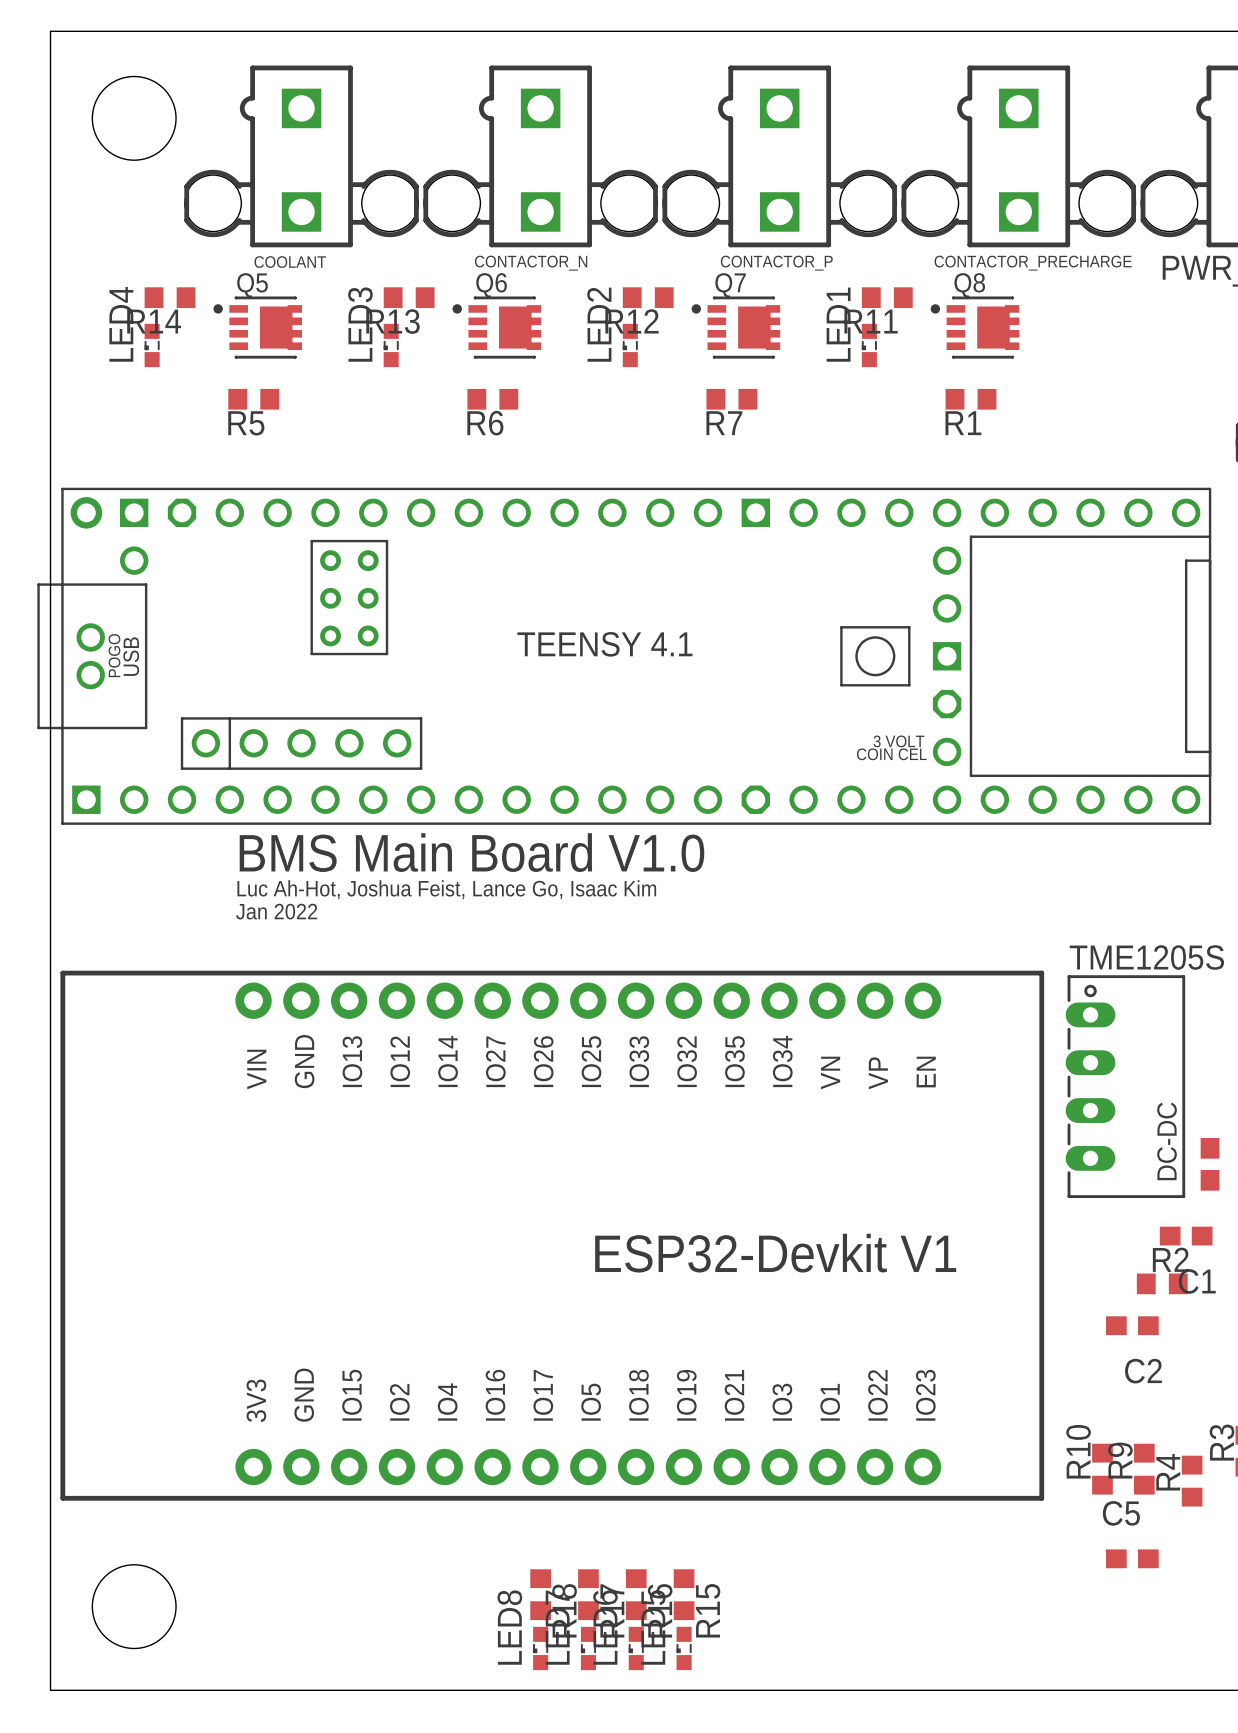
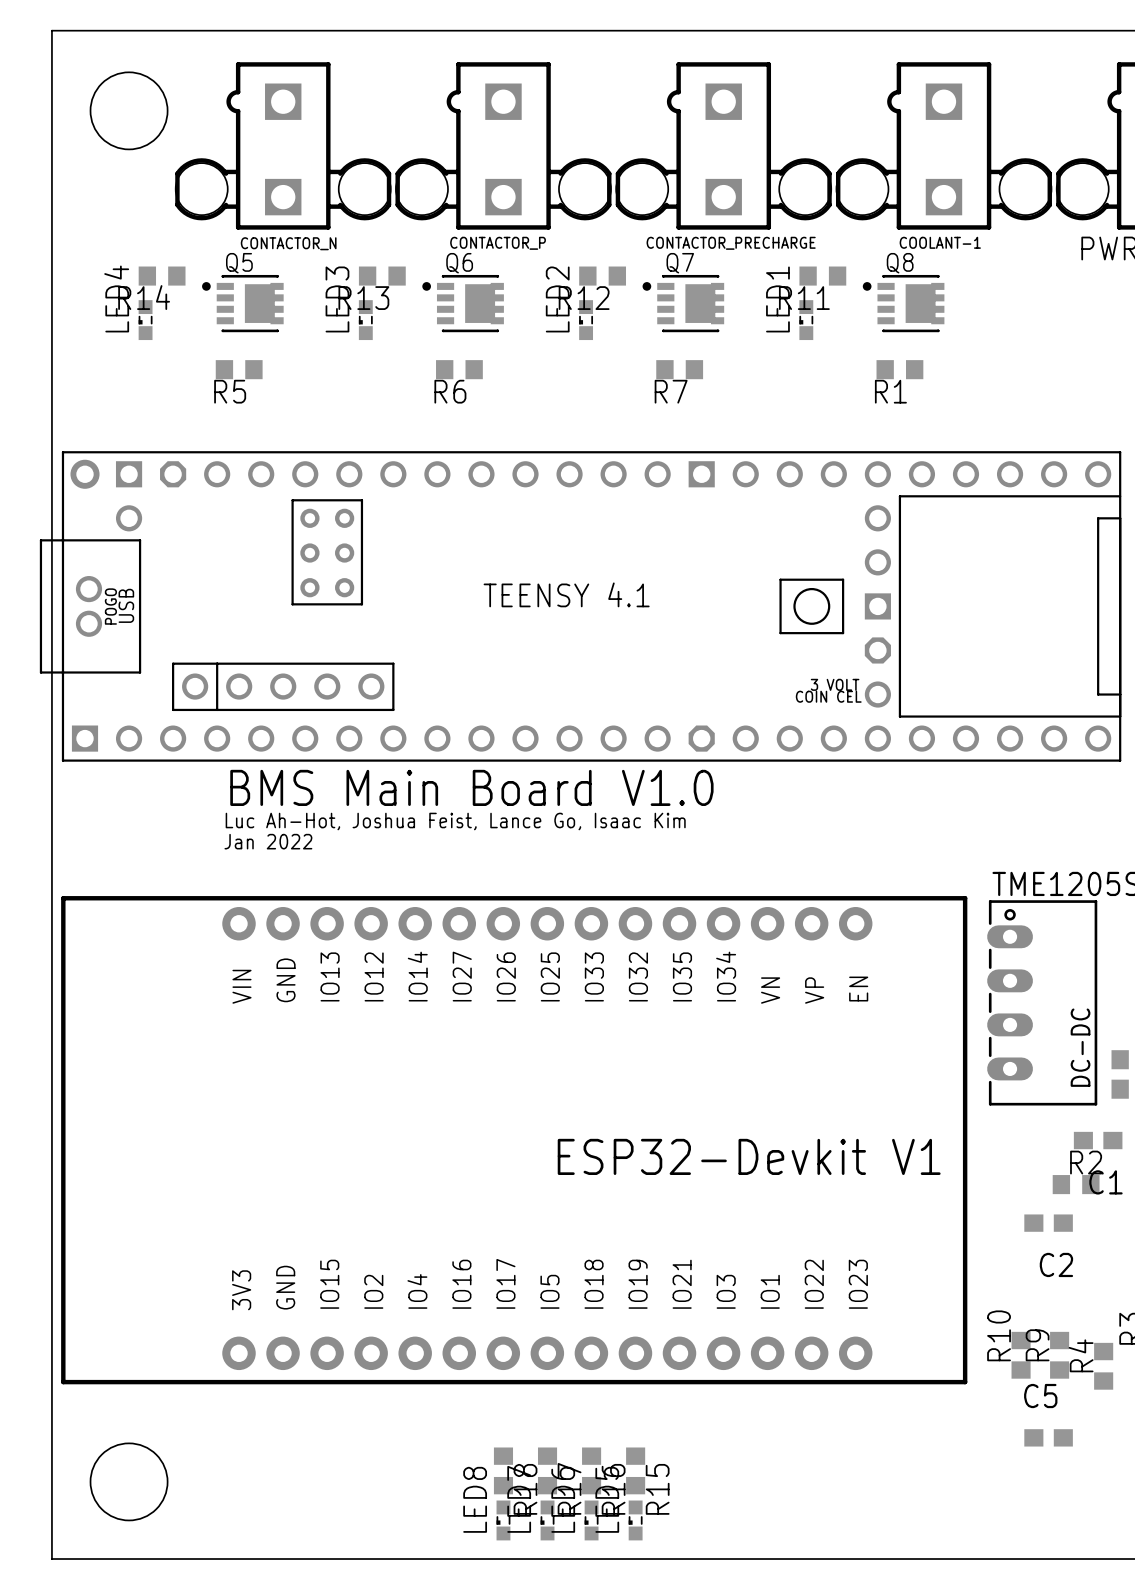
COOLANT name: COOLANT (290, 262) -> CONTACTOR_N (288, 243)
CONTACTOR_N name: CONTACTOR_N (531, 263) -> CONTACTOR_P (498, 243)
CONTACTOR_P name: CONTACTOR_P (776, 263) -> CONTACTOR_PRECHARGE (731, 243)
CONTACTOR_PRECHARGE name: CONTACTOR_PRECHARGE (1033, 263) -> COOLANT-1 (940, 242)

